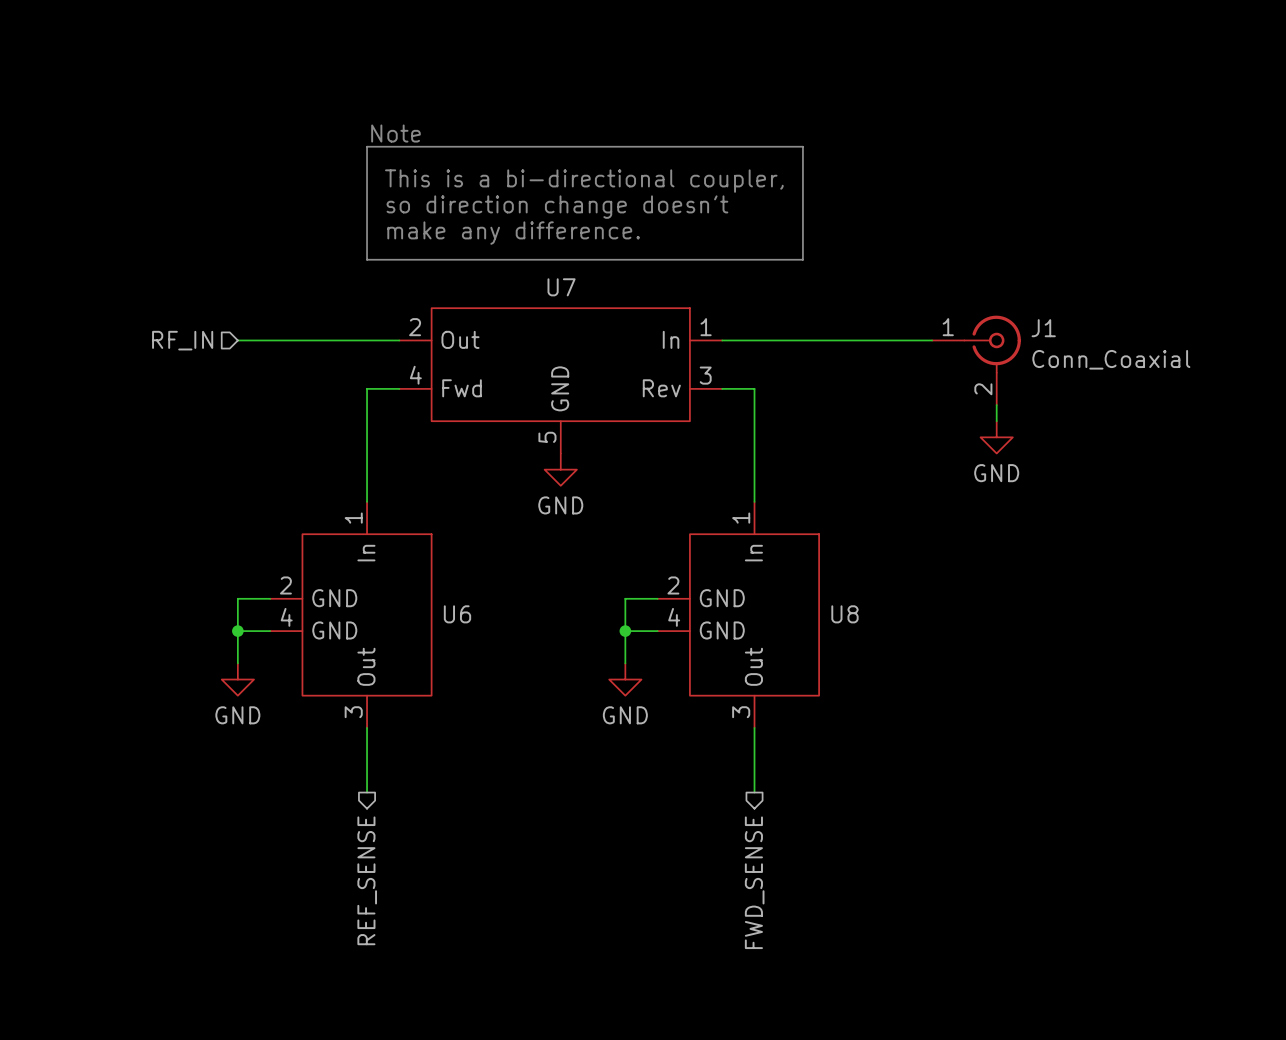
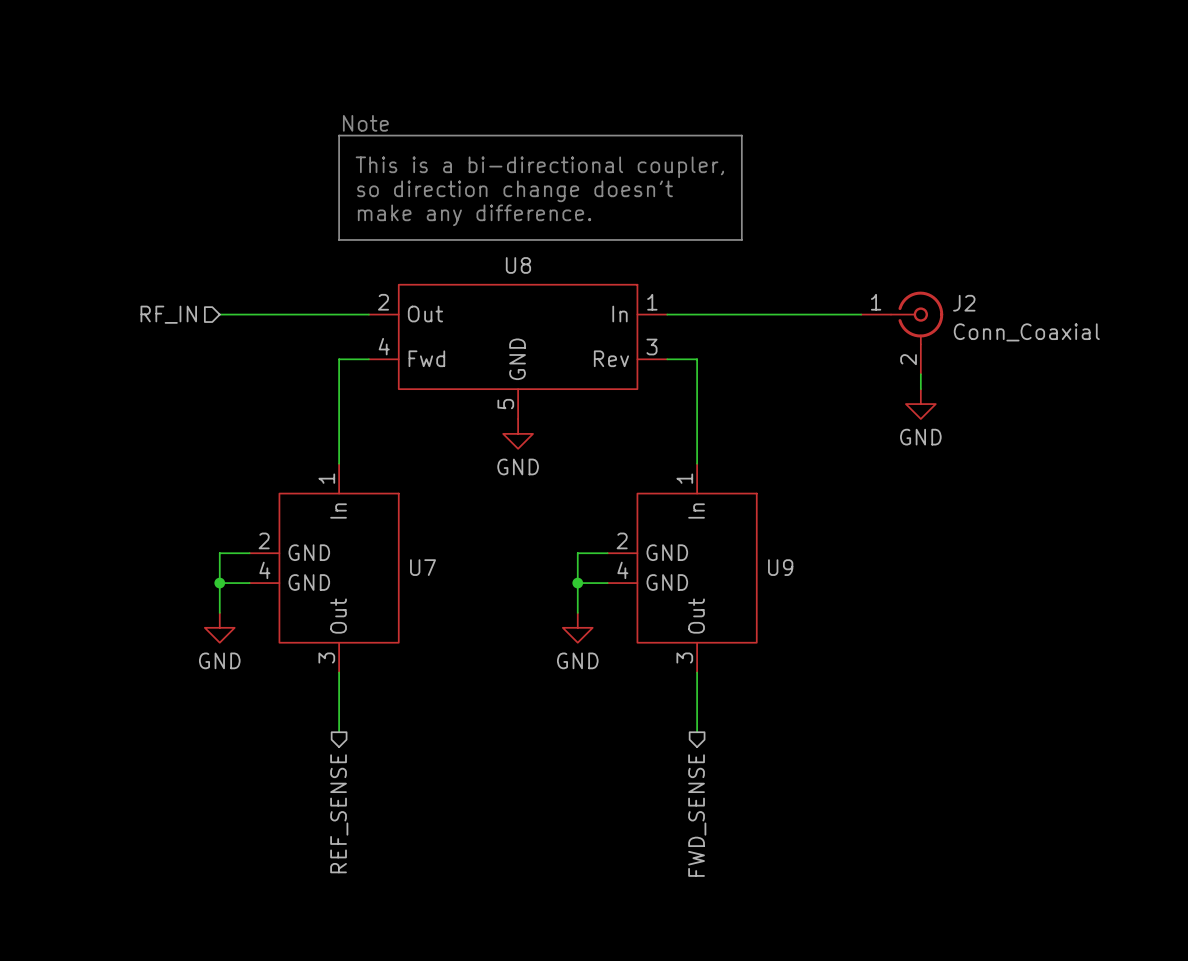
U7 name: U7 (561, 287) -> U8 (518, 265)
J1 name: J1 (1043, 328) -> J2 (964, 303)
U6 name: U6 (457, 614) -> U7 (423, 567)
U8 name: U8 (844, 614) -> U9 (780, 567)

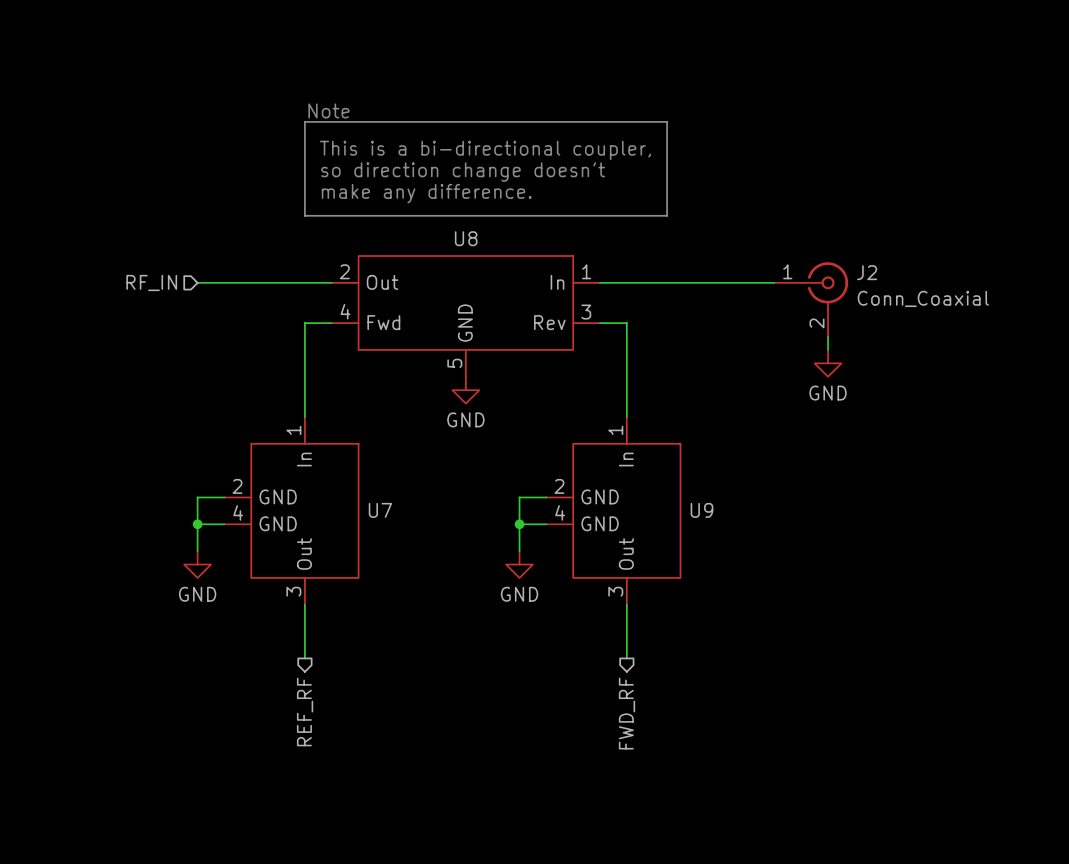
hierarchical label: REF_SENSE (339, 813) -> REF_RF (305, 711)
hierarchical label: FWD_SENSE (697, 815) -> FWD_RF (626, 713)

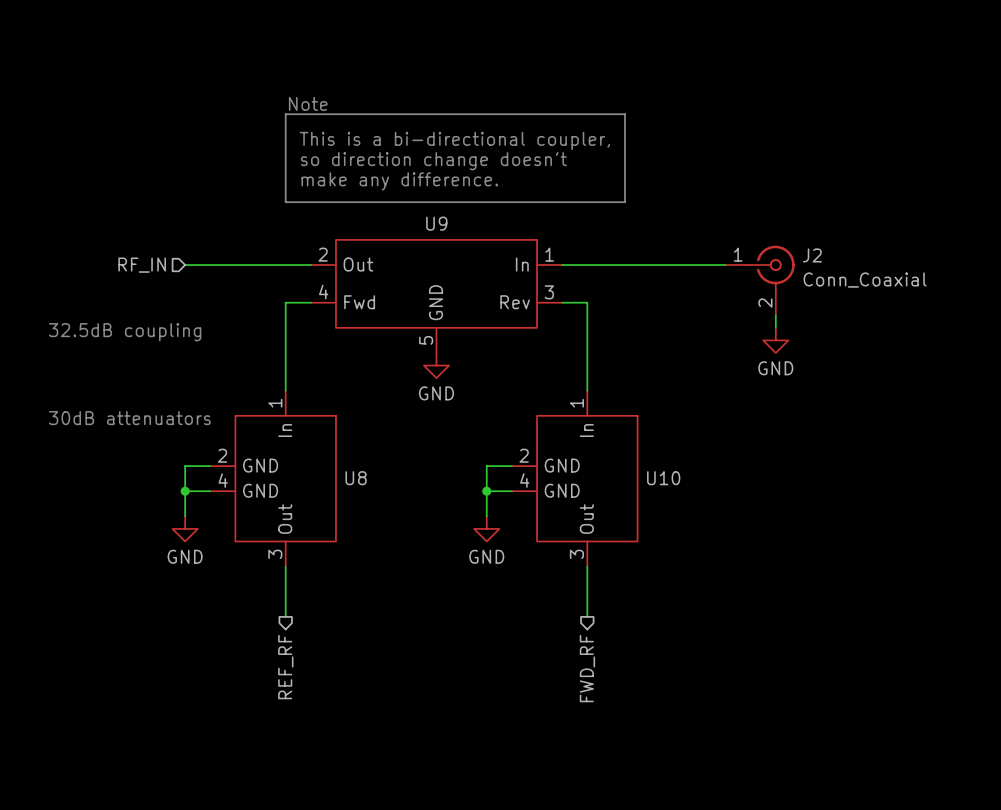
U8 name: U8 (466, 238) -> U9 (436, 223)
text: none -> 32.5dB coupling (125, 332)
text: none -> 30dB attenuators (129, 418)
U7 name: U7 (380, 510) -> U8 (356, 478)
U9 name: U9 (701, 510) -> U10 (663, 478)

